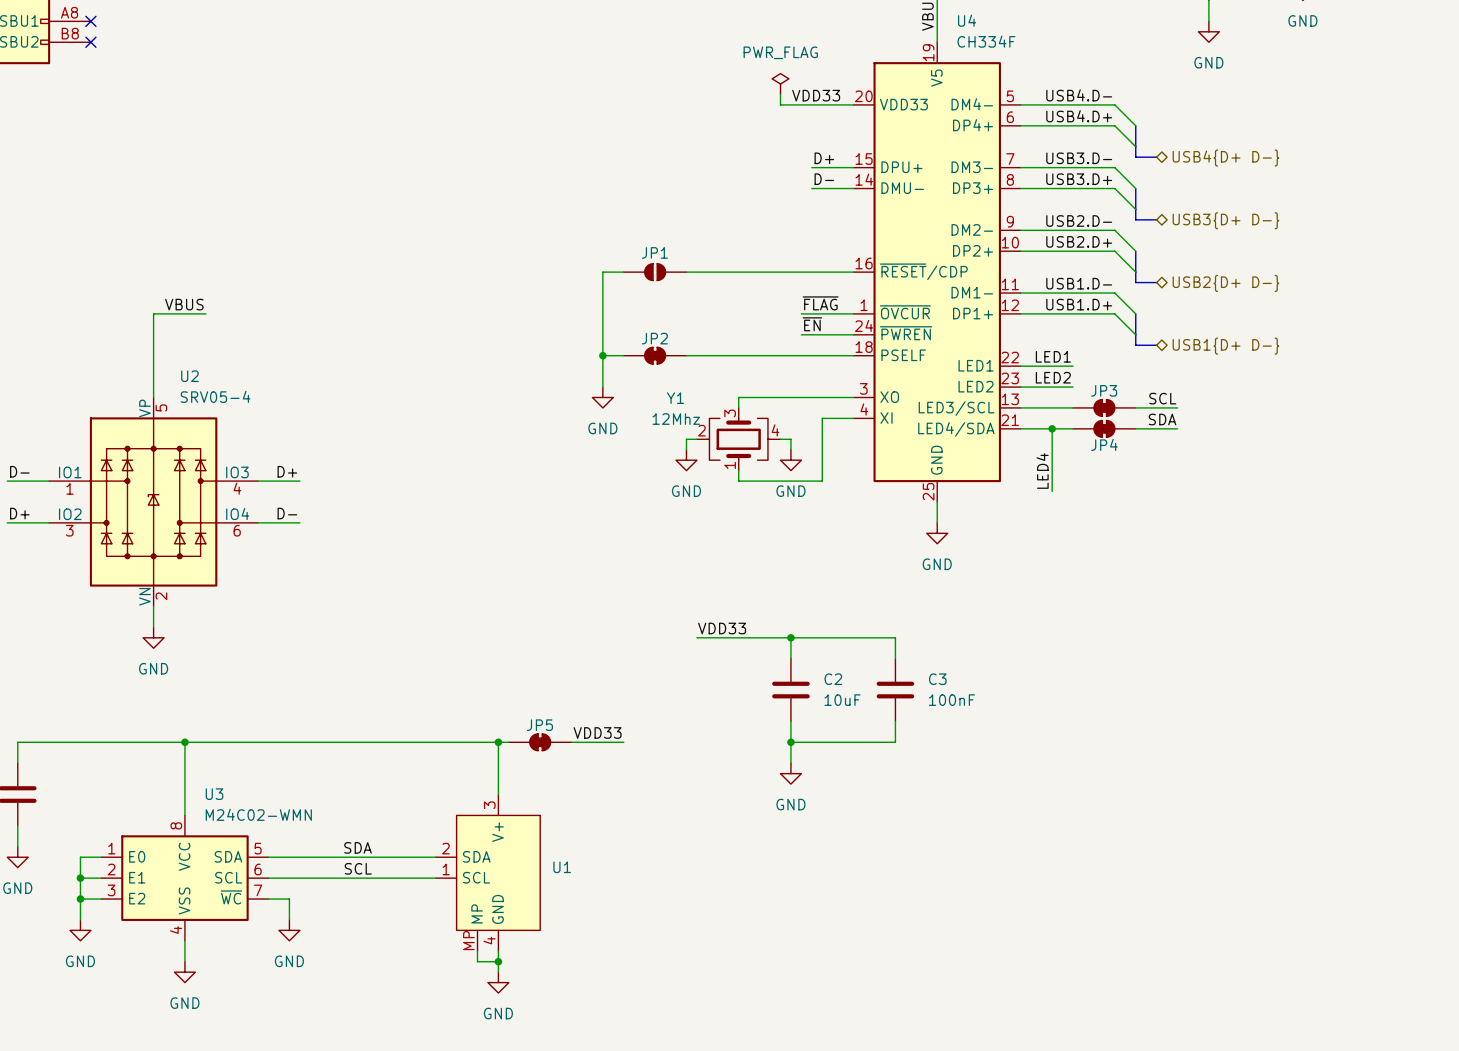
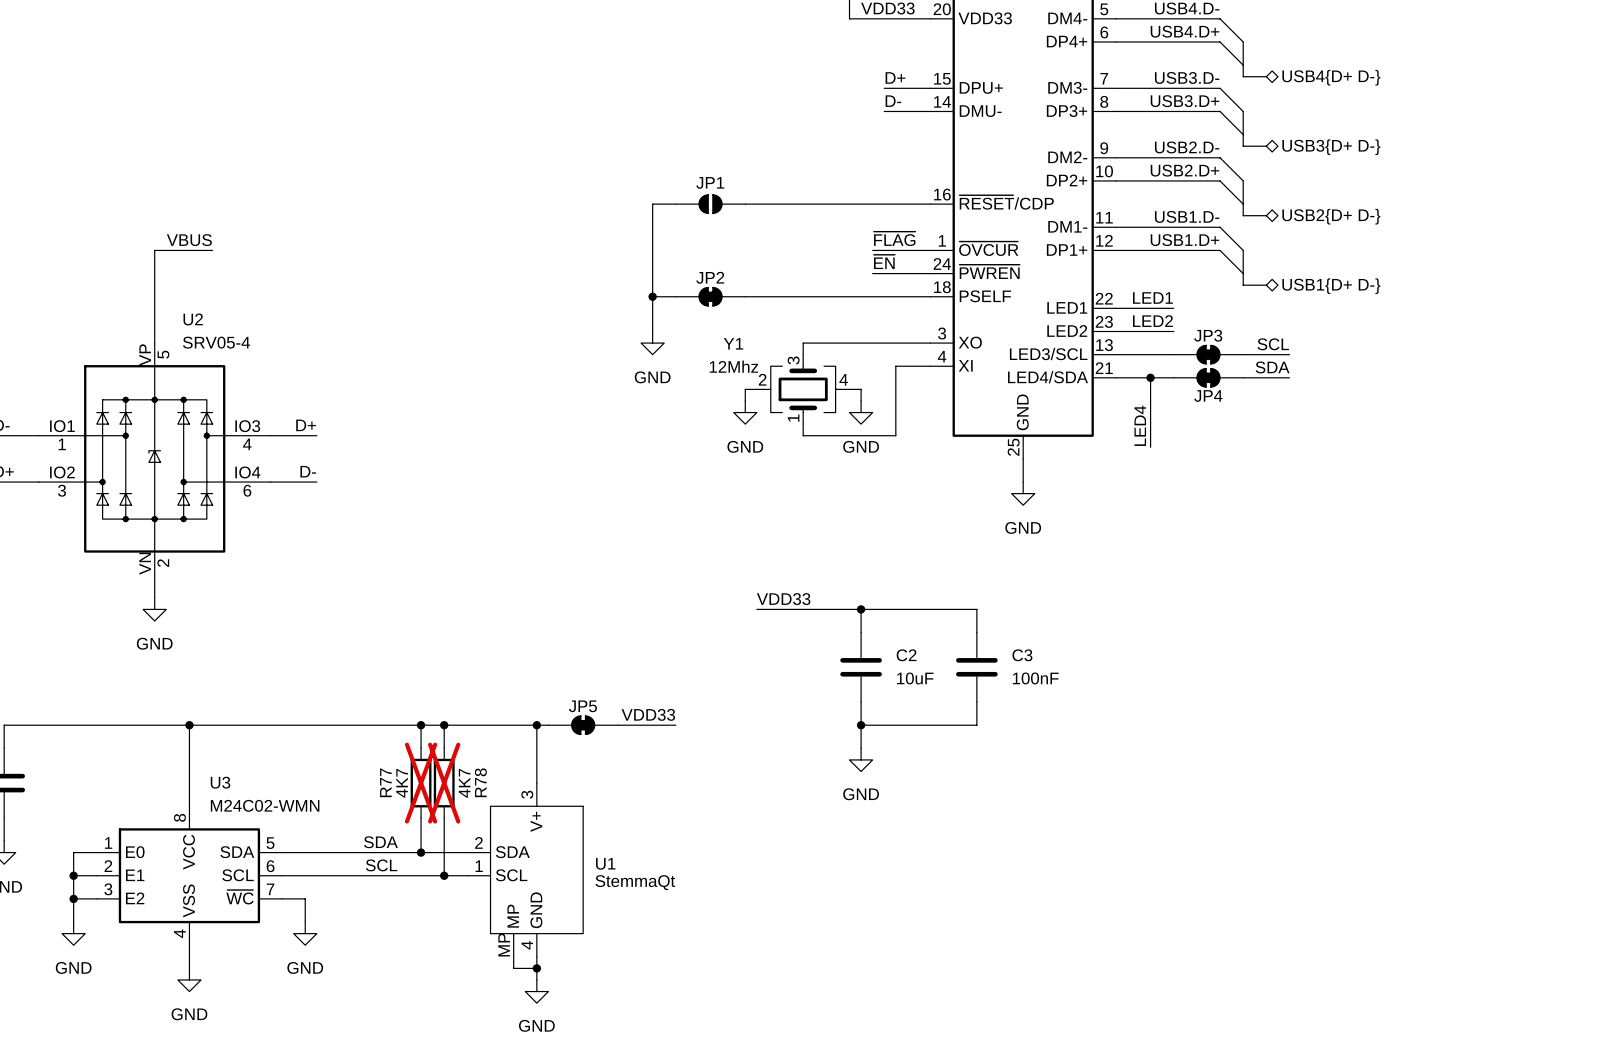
wire: none -> (421, 725) (421, 748)
junction: none -> (421, 725)
wire: none -> (444, 725) (444, 748)
junction: none -> (444, 725)
R77: none -> 4K7 (421, 783)
R78: none -> 4K7 (444, 783)
wire: none -> (421, 817) (421, 852)
wire: none -> (444, 817) (444, 875)
junction: none -> (421, 852)
junction: none -> (444, 875)
U1 value: none -> StemmaQt (635, 882)

